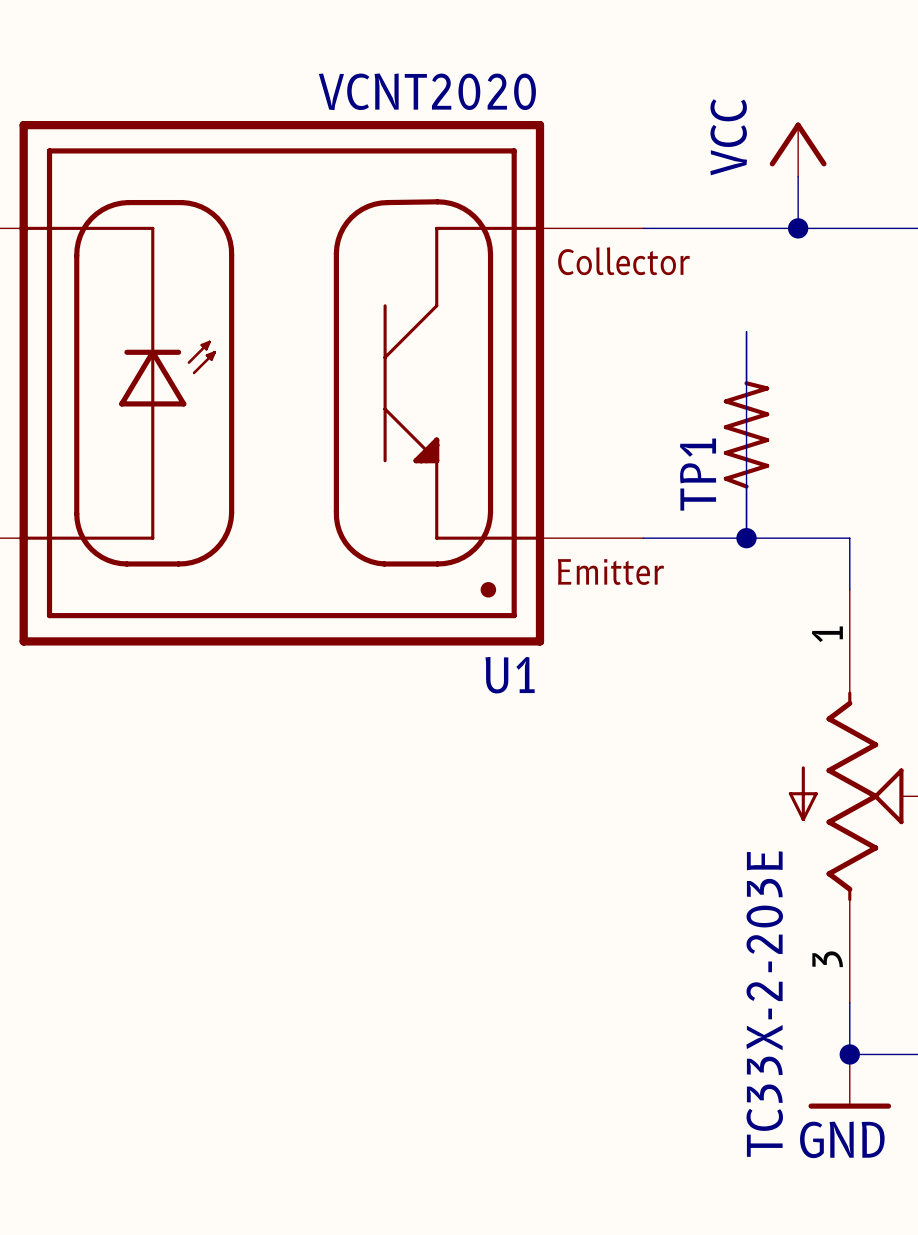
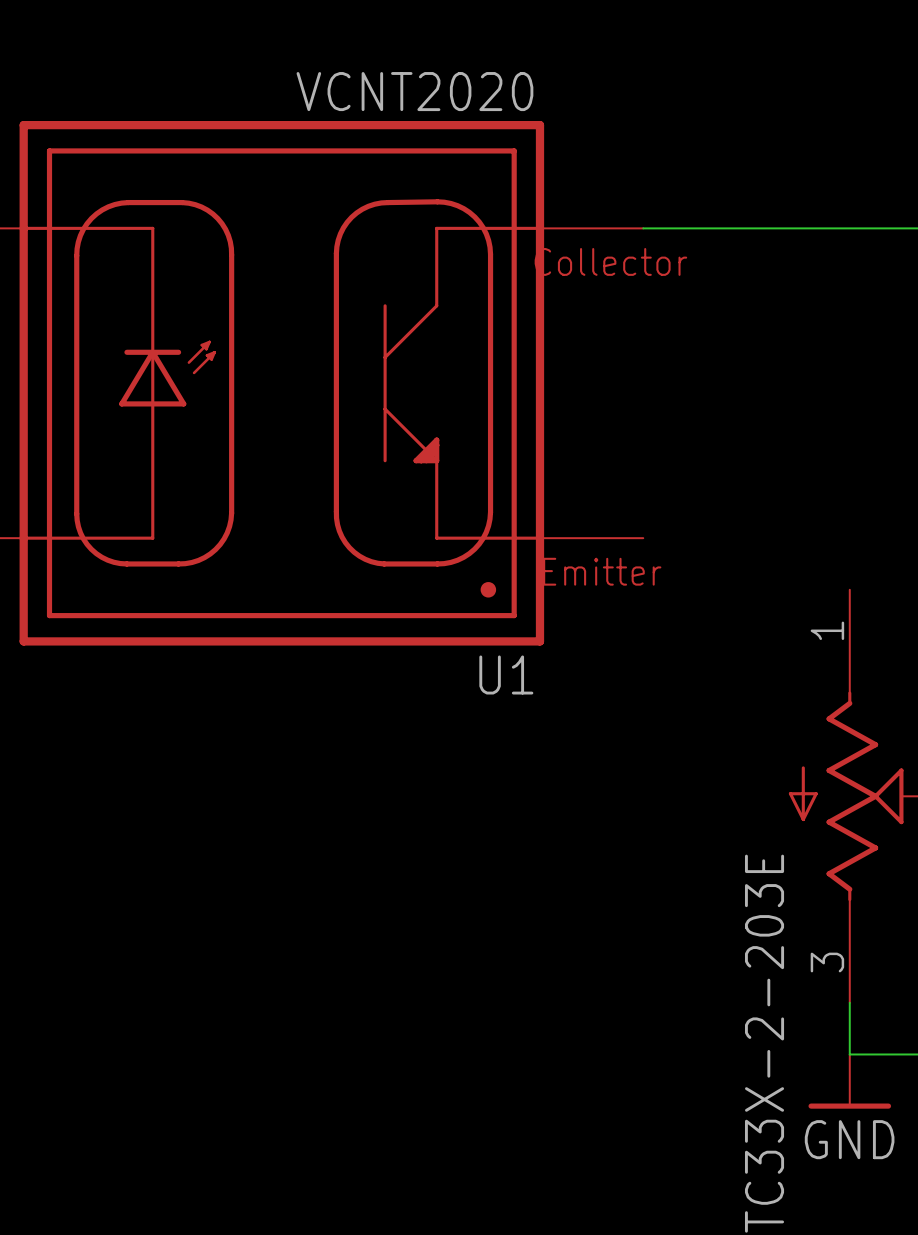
power symbol: VCC (798, 149) -> none
wire: (798, 176) (798, 228) -> none
junction: (798, 228) -> none
wire: (746, 331) (746, 538) -> none
TP1: (746, 434) -> none
wire: (643, 538) (849, 538) (849, 589) -> none
junction: (746, 538) -> none
junction: (849, 1054) -> none

